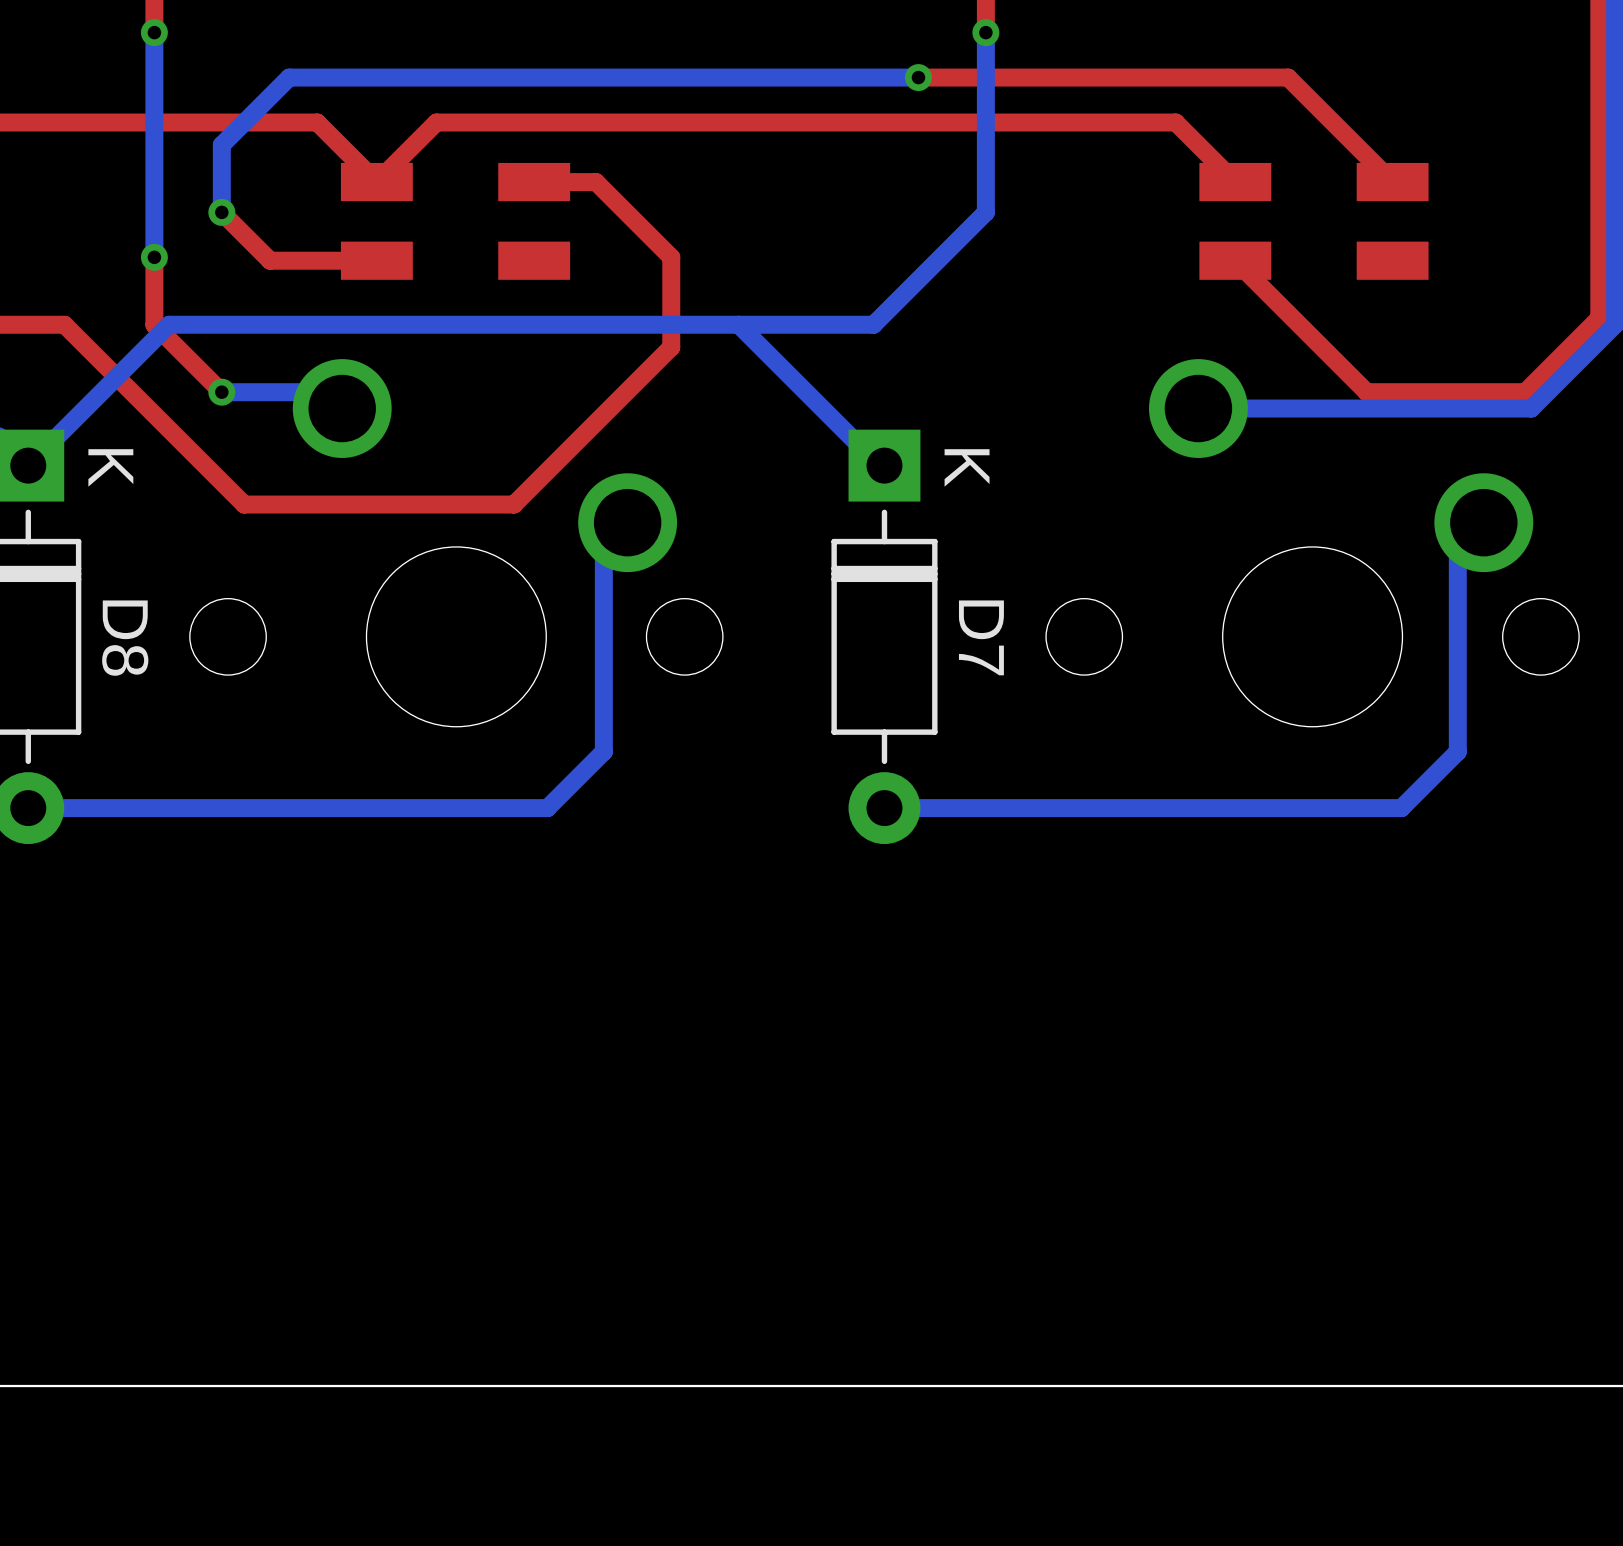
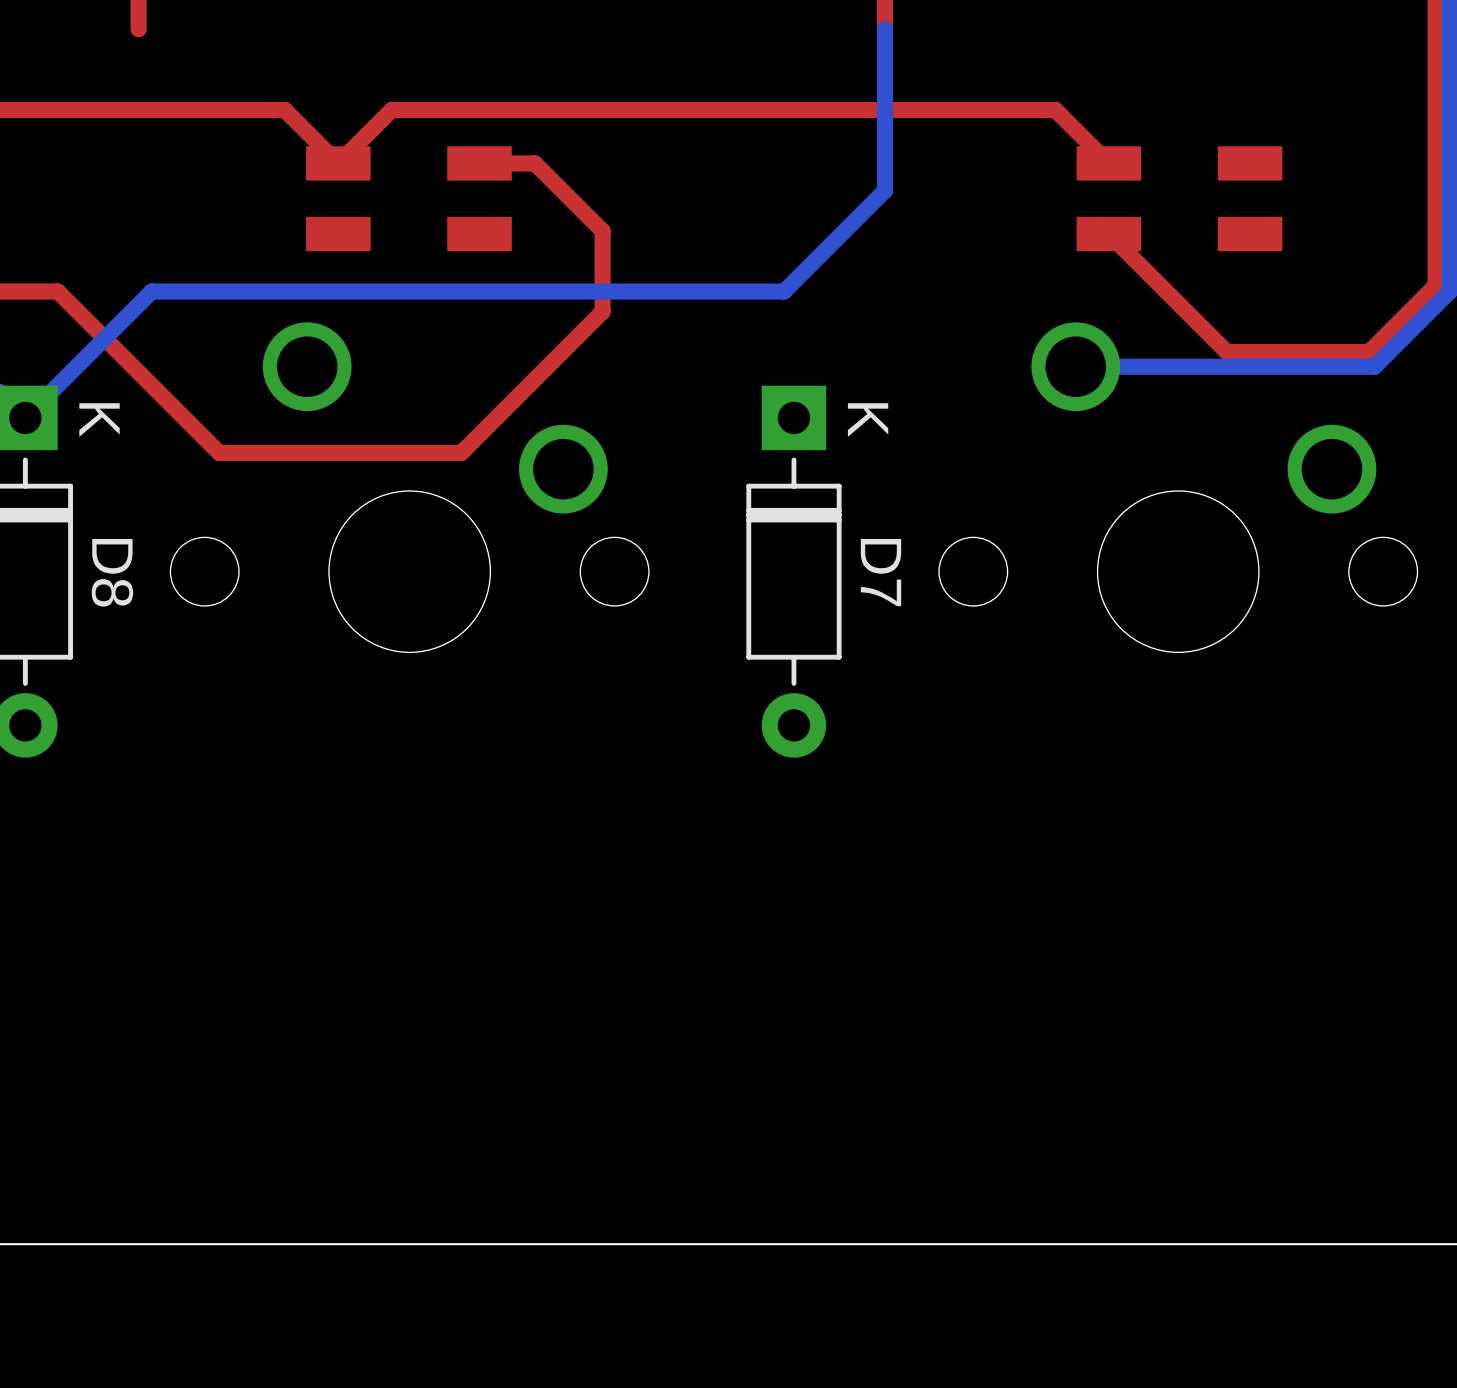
bottom track: (154, 32) (154, 257) -> none
via: (154, 32) -> none
via: (985, 32) -> none
bottom track: (918, 77) (289, 77) (221, 144) (221, 212) -> none
top track: (918, 77) (1288, 77) (1392, 182) -> none
via: (918, 77) -> none
top track: (221, 212) (270, 260) (376, 260) -> none
via: (221, 212) -> none
top track: (154, 257) (154, 324) (221, 392) -> none
via: (154, 257) -> none
bottom track: (738, 324) (879, 465) (884, 465) -> none
bottom track: (221, 392) (325, 392) (342, 408) -> none
via: (221, 392) -> none
bottom track: (627, 522) (603, 546) (603, 751) (547, 808) (28, 808) -> none
bottom track: (1483, 522) (1457, 548) (1457, 751) (1401, 808) (884, 808) -> none

